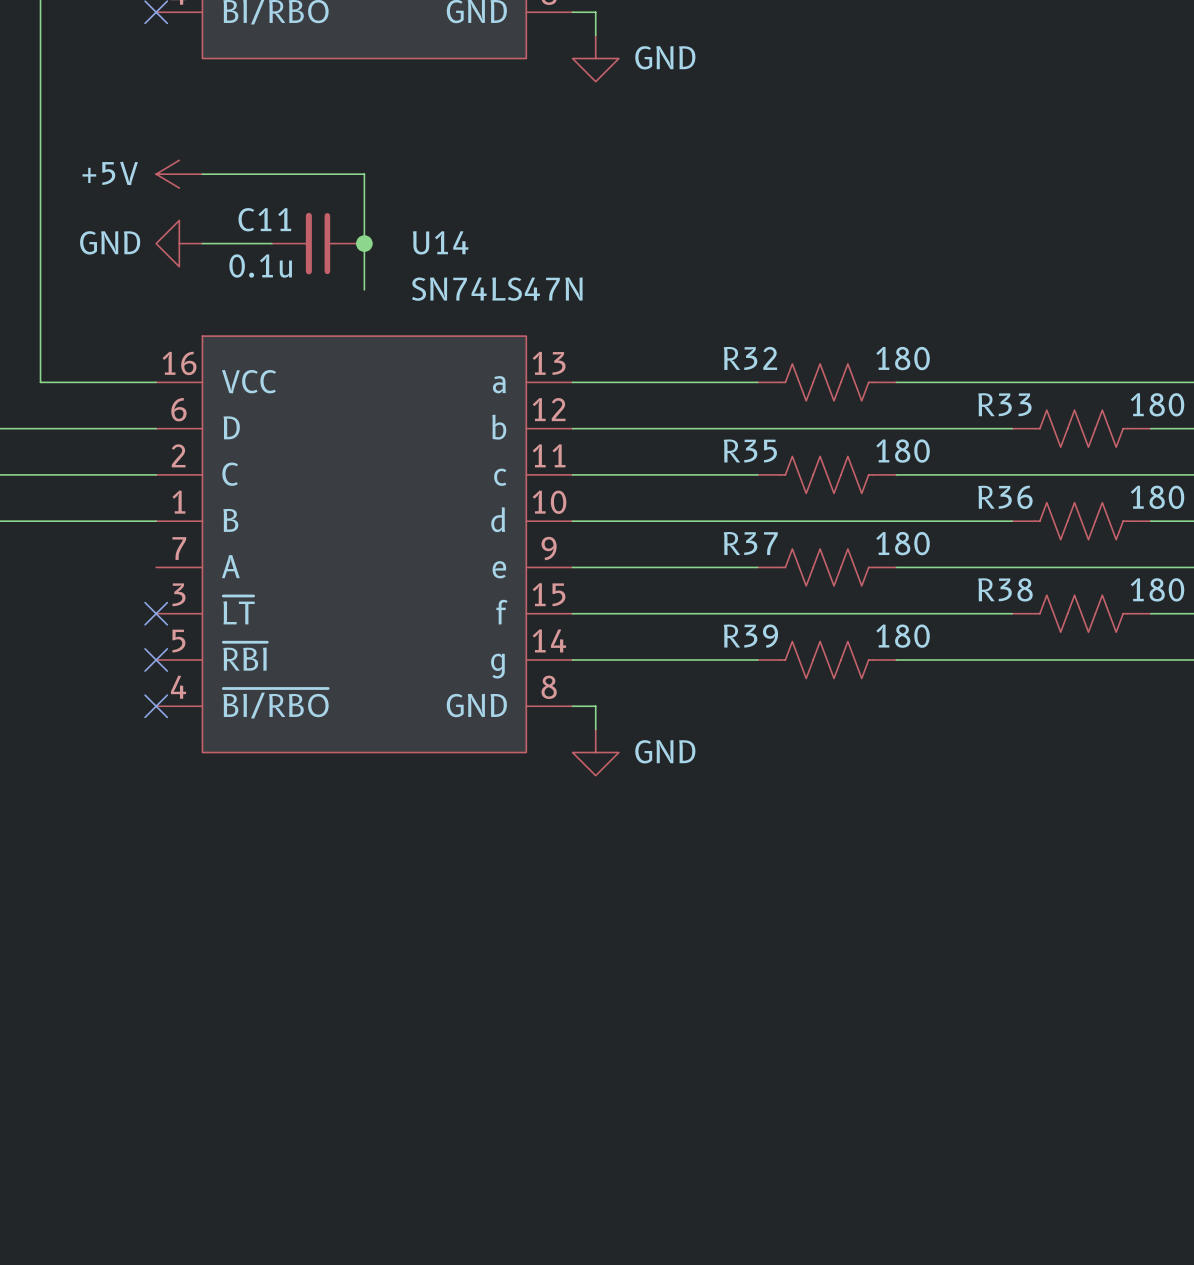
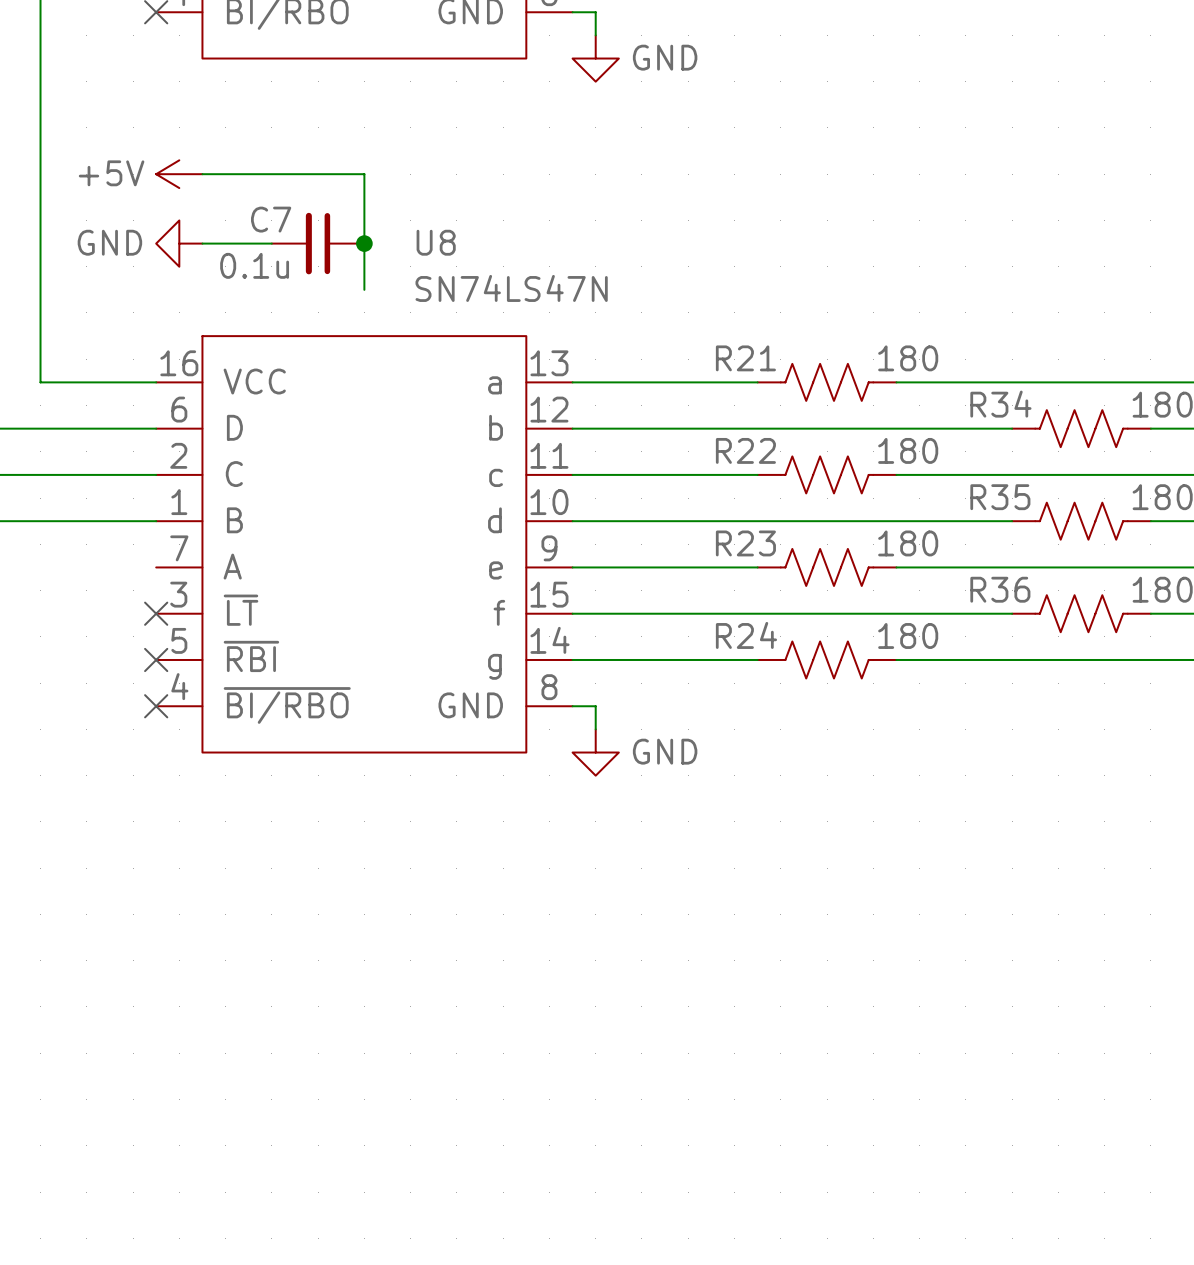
C11 name: C11 (264, 219) -> C7 (271, 219)
U14 name: U14 (440, 242) -> U8 (436, 242)
R32 name: R32 (750, 358) -> R21 (745, 358)
R33 name: R33 (1004, 404) -> R34 (1000, 404)
R35 name: R35 (750, 450) -> R22 (745, 450)
R36 name: R36 (1005, 497) -> R35 (1000, 497)
R37 name: R37 (750, 543) -> R23 (745, 543)
R38 name: R38 (1005, 589) -> R36 (1000, 589)
R39 name: R39 (750, 636) -> R24 (746, 635)

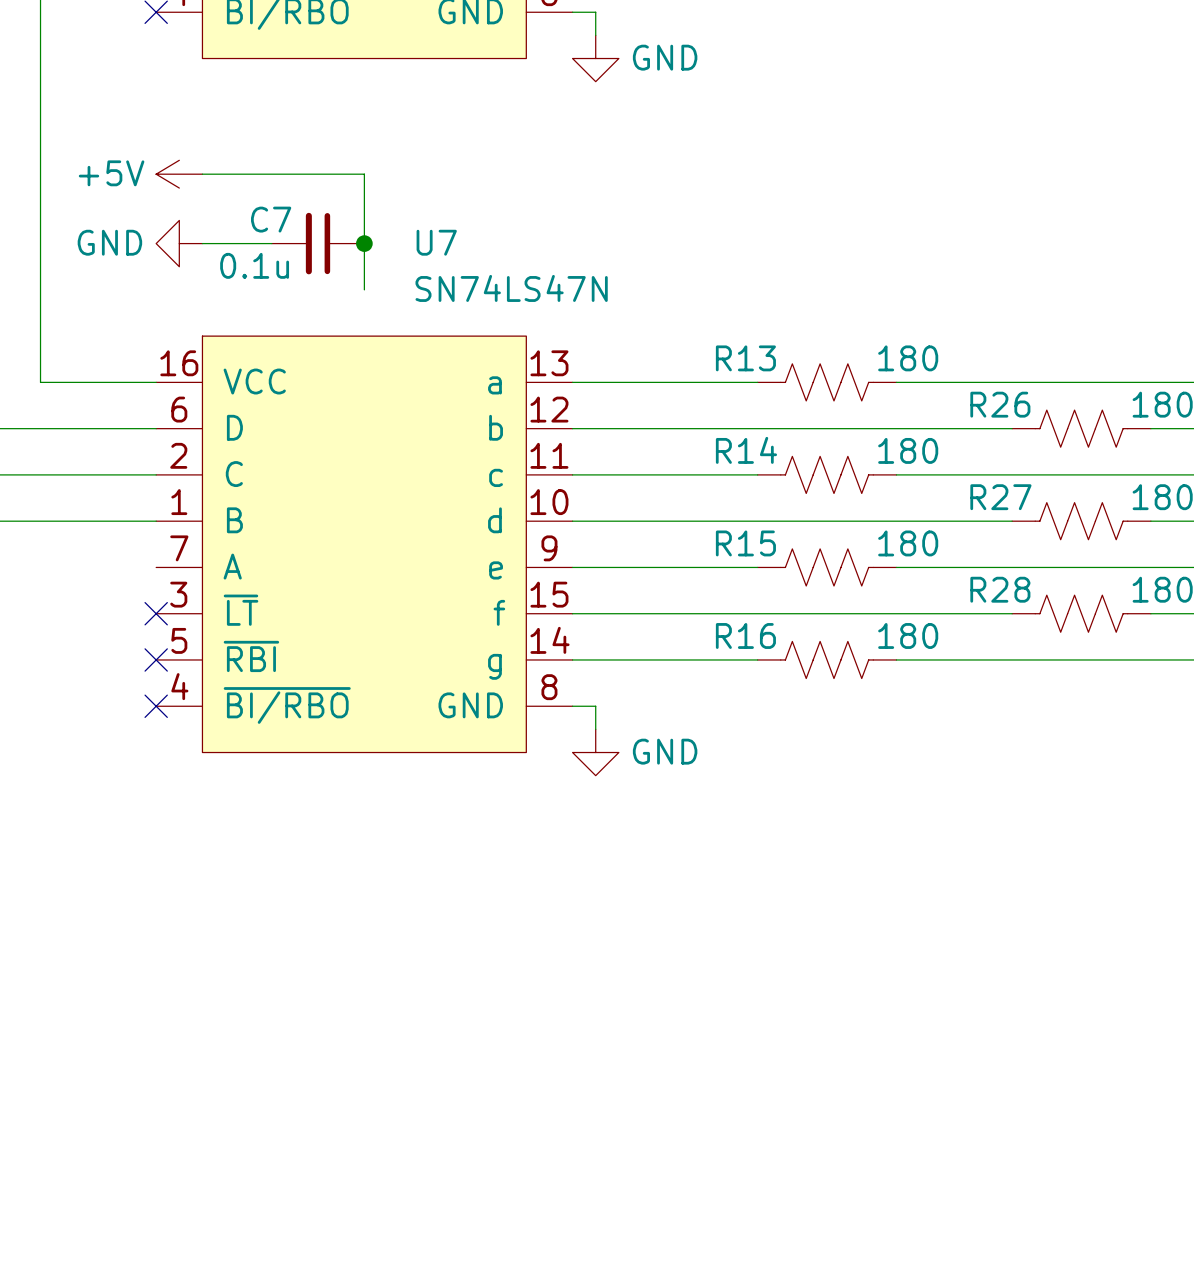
U8 name: U8 (436, 242) -> U7 (436, 242)
R21 name: R21 (745, 358) -> R13 (745, 358)
R34 name: R34 (1000, 404) -> R26 (1000, 404)
R22 name: R22 (745, 450) -> R14 (746, 450)
R35 name: R35 (1000, 497) -> R27 (1000, 497)
R23 name: R23 (745, 543) -> R15 (745, 543)
R36 name: R36 (1000, 589) -> R28 (1000, 589)
R24 name: R24 (746, 635) -> R16 (745, 635)

